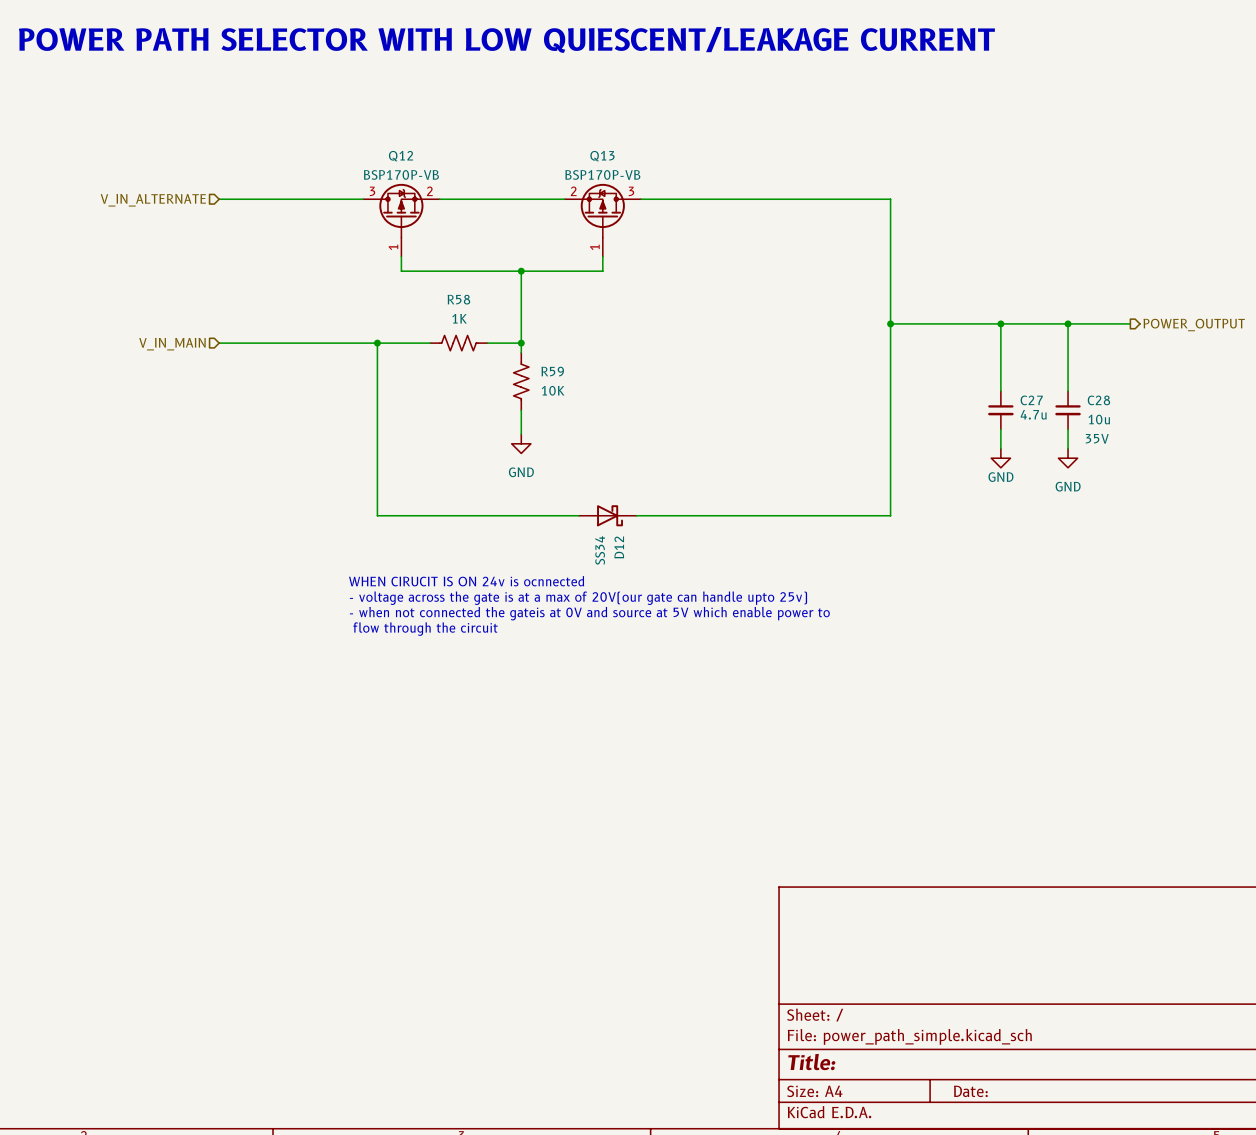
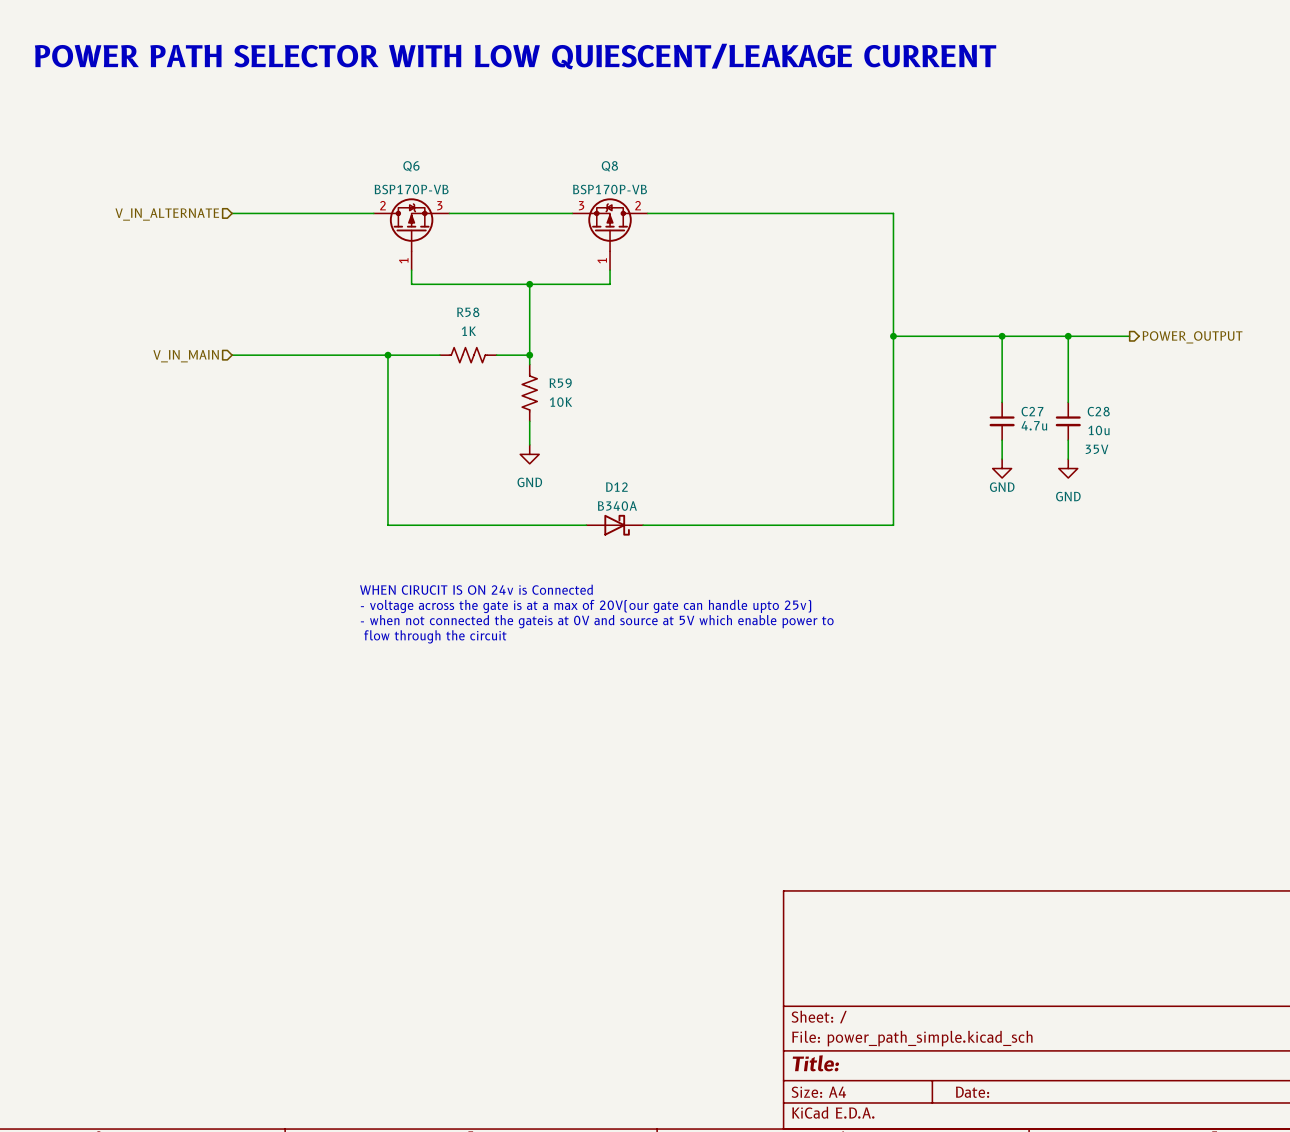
Q12 name: Q12 (401, 156) -> Q6 (411, 166)
Q13 name: Q13 (602, 156) -> Q8 (609, 166)
Q12 pin number: 3 (372, 191) -> 2 (382, 205)
Q12 pin number: 2 (429, 191) -> 3 (439, 205)
Q13 pin number: 2 (573, 191) -> 3 (581, 205)
Q13 pin number: 3 (631, 191) -> 2 (638, 205)
D12 name rotation: 0° (619, 547) -> 90° clockwise (616, 487)
D12 name position: D12 (619, 547) -> D12 (616, 487)
D12 value: SS34 (600, 550) -> B340A (617, 506)
text: WHEN CIRUCIT IS ON 24v is ocnnected (466, 581) -> WHEN CIRUCIT IS ON 24v is Connected (476, 589)

